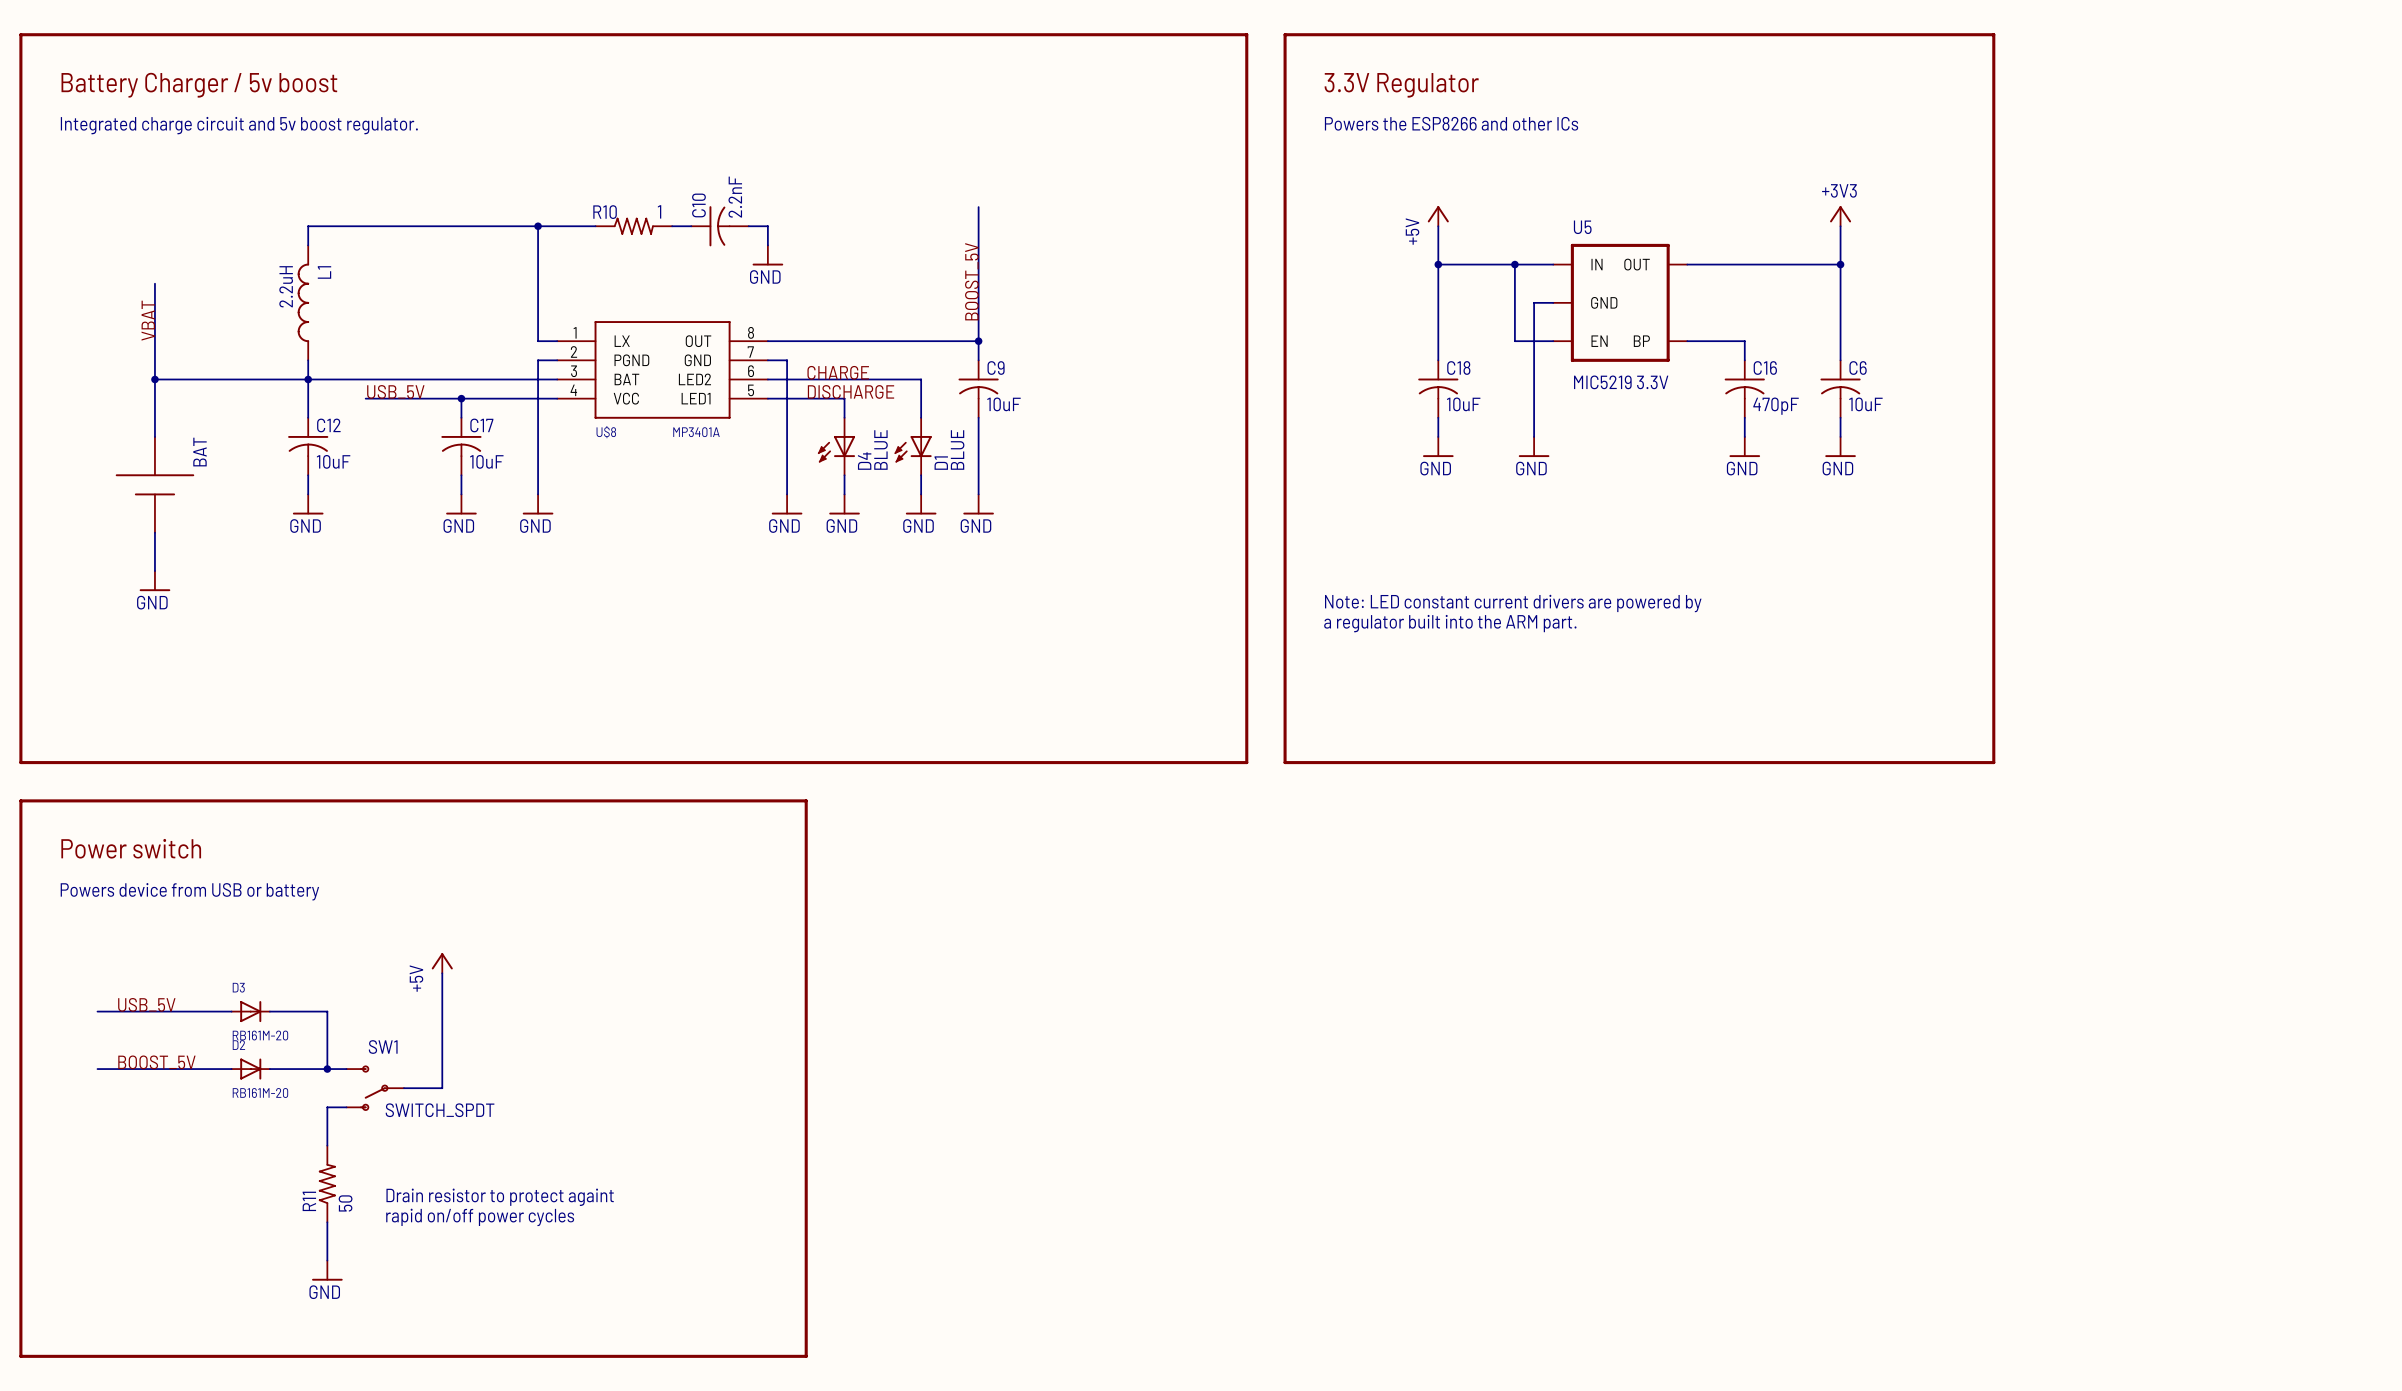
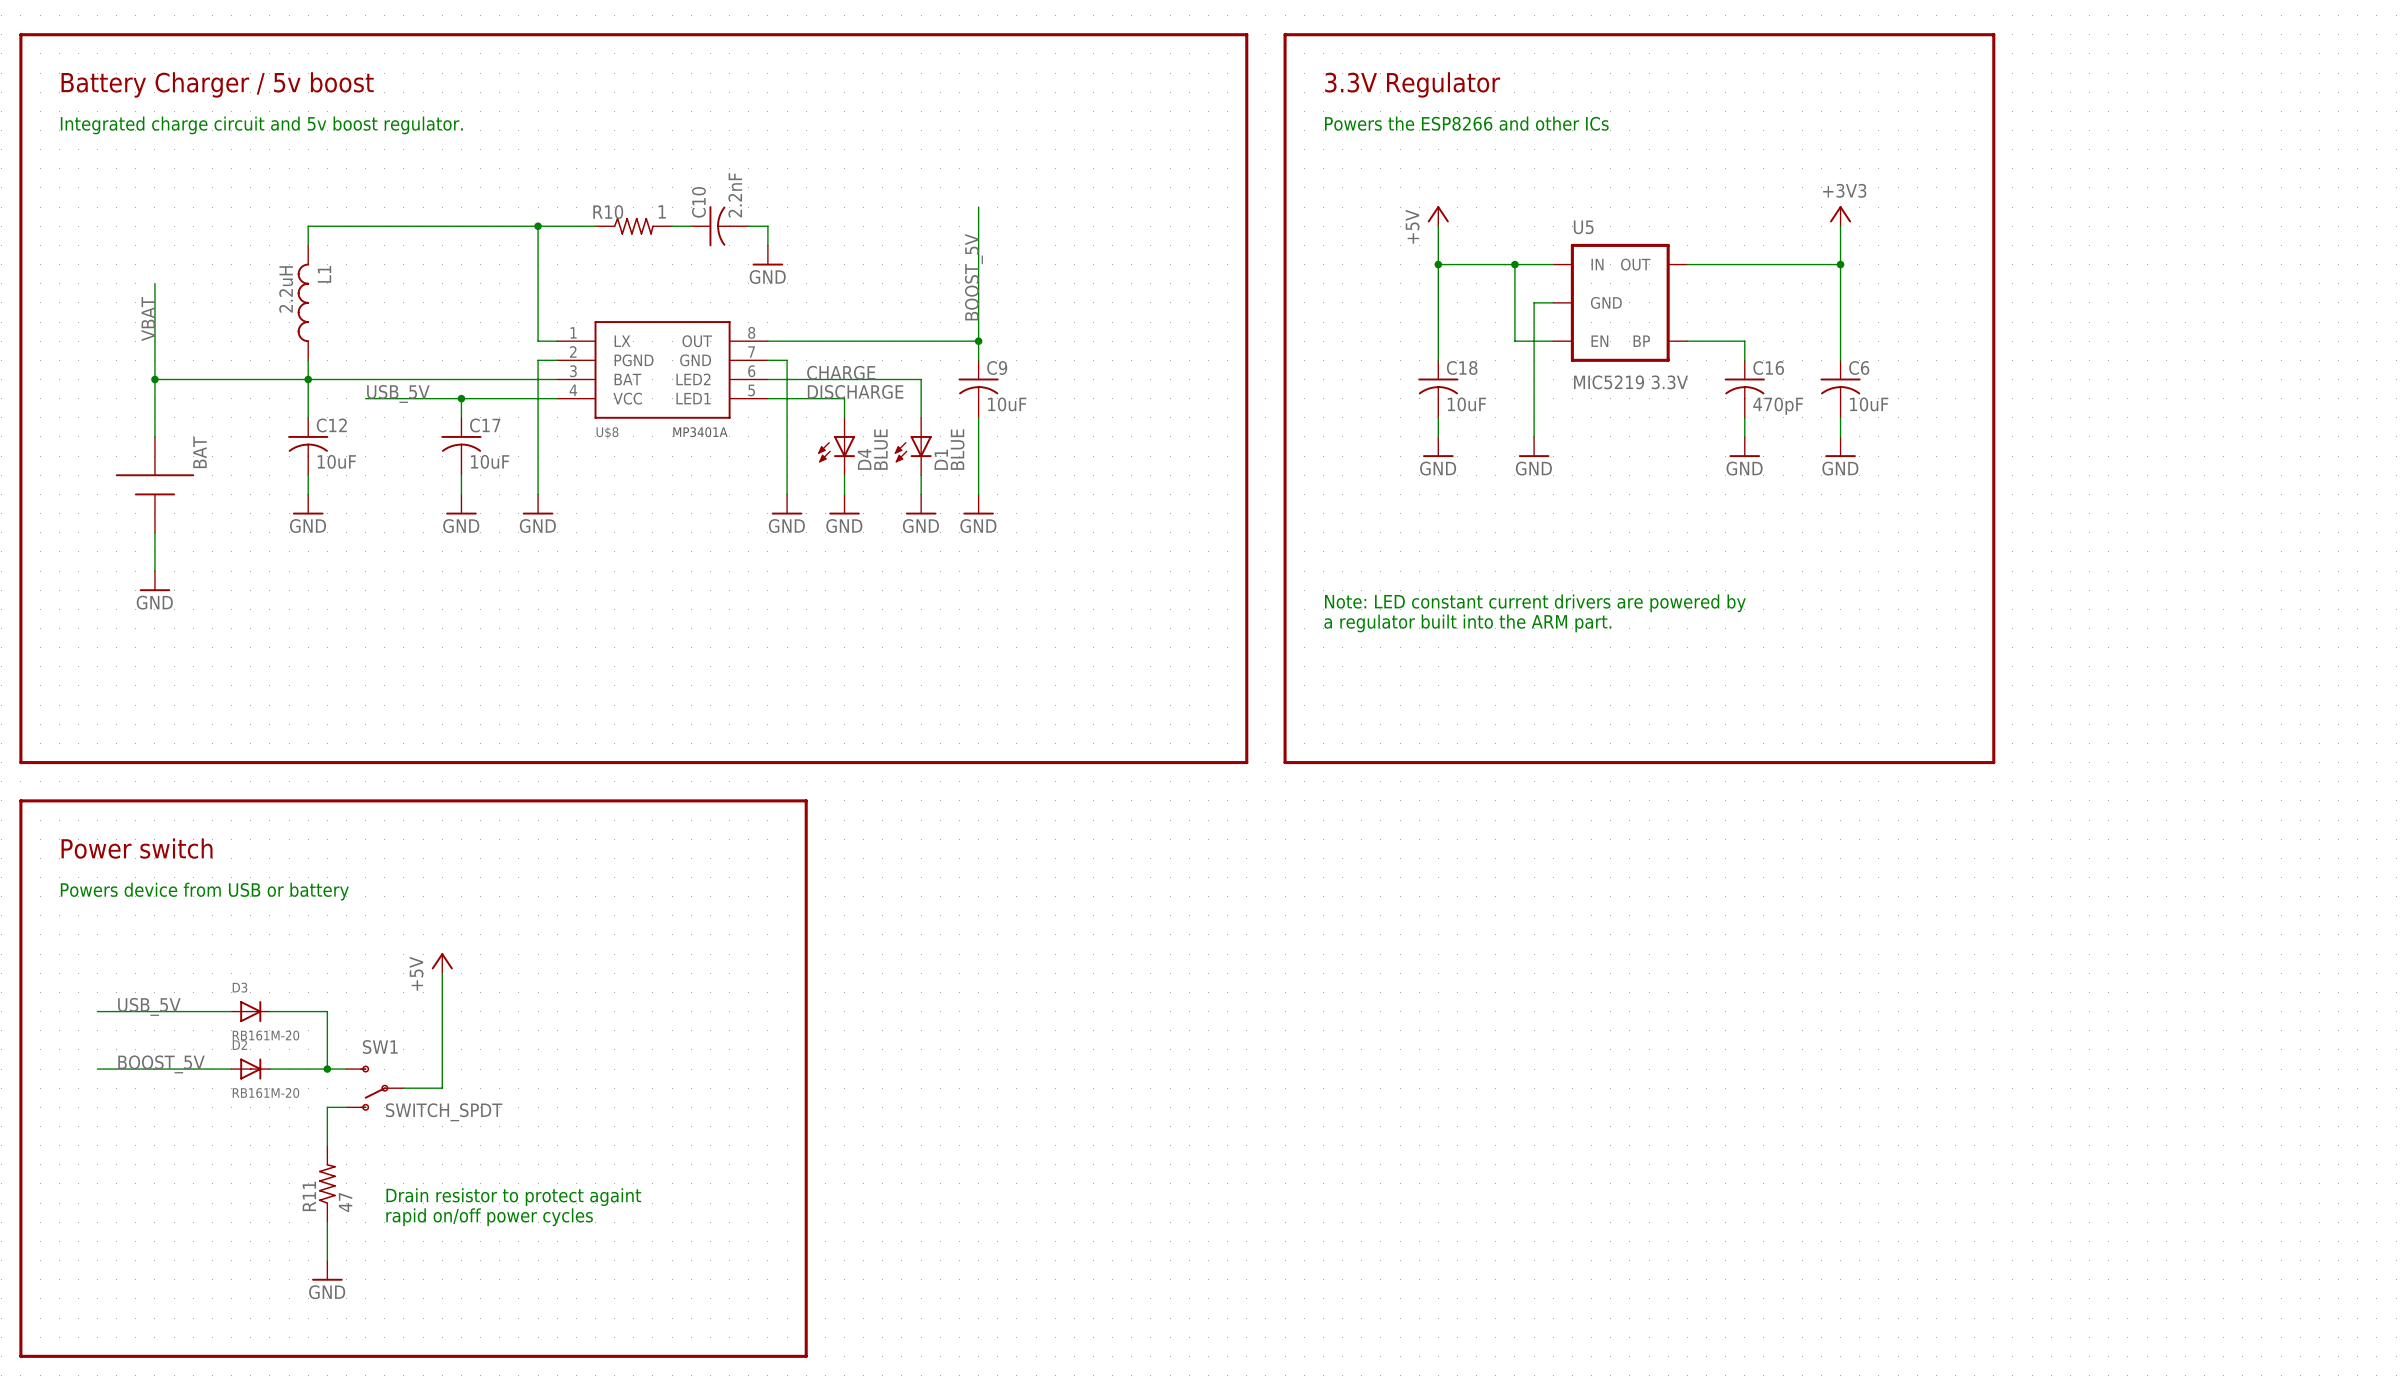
R11 value: 50 (345, 1203) -> 47 (345, 1202)

